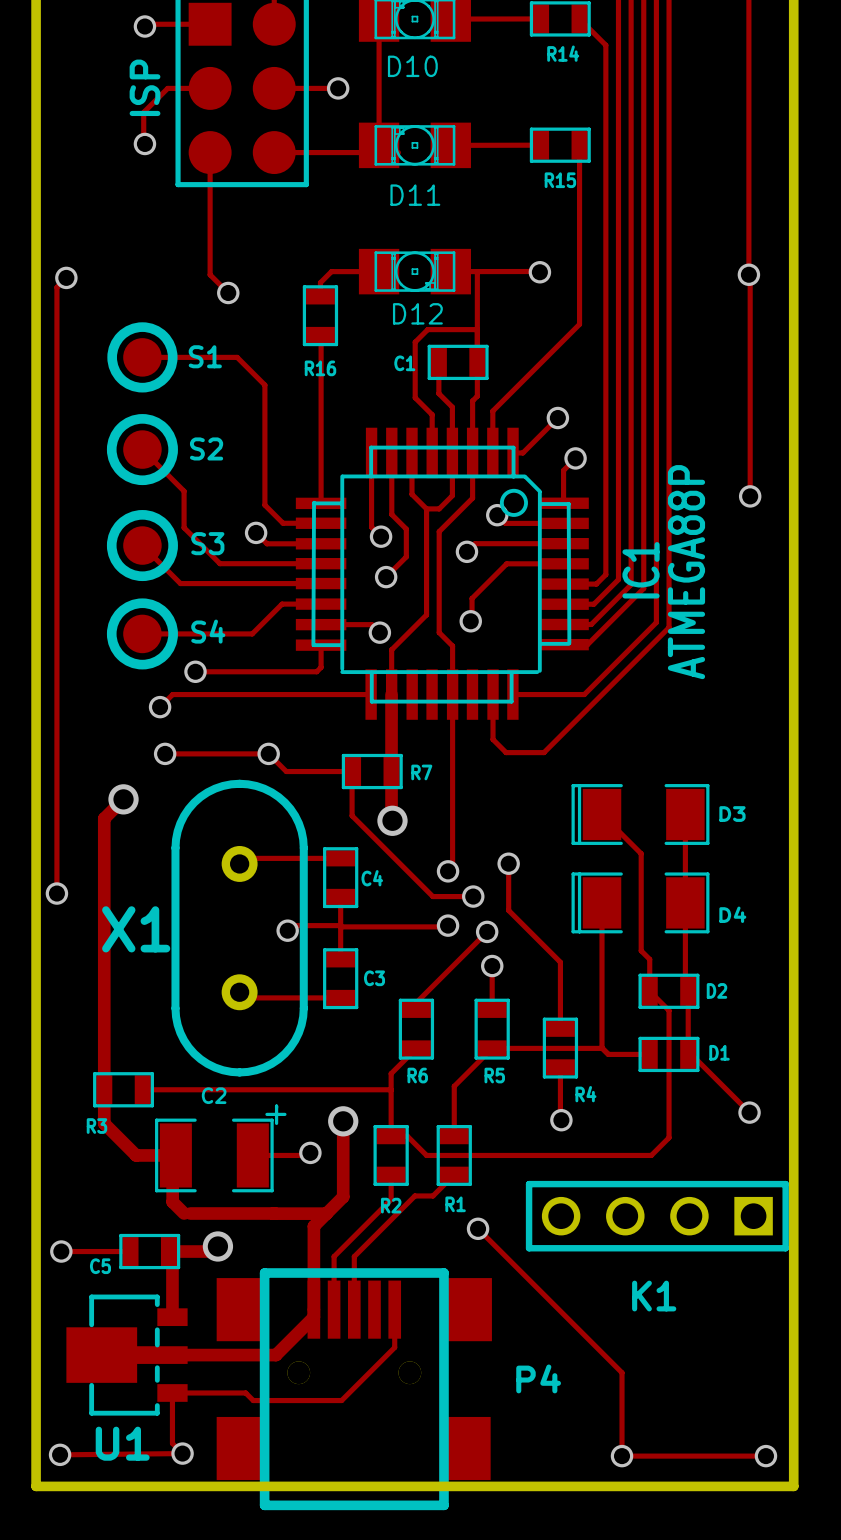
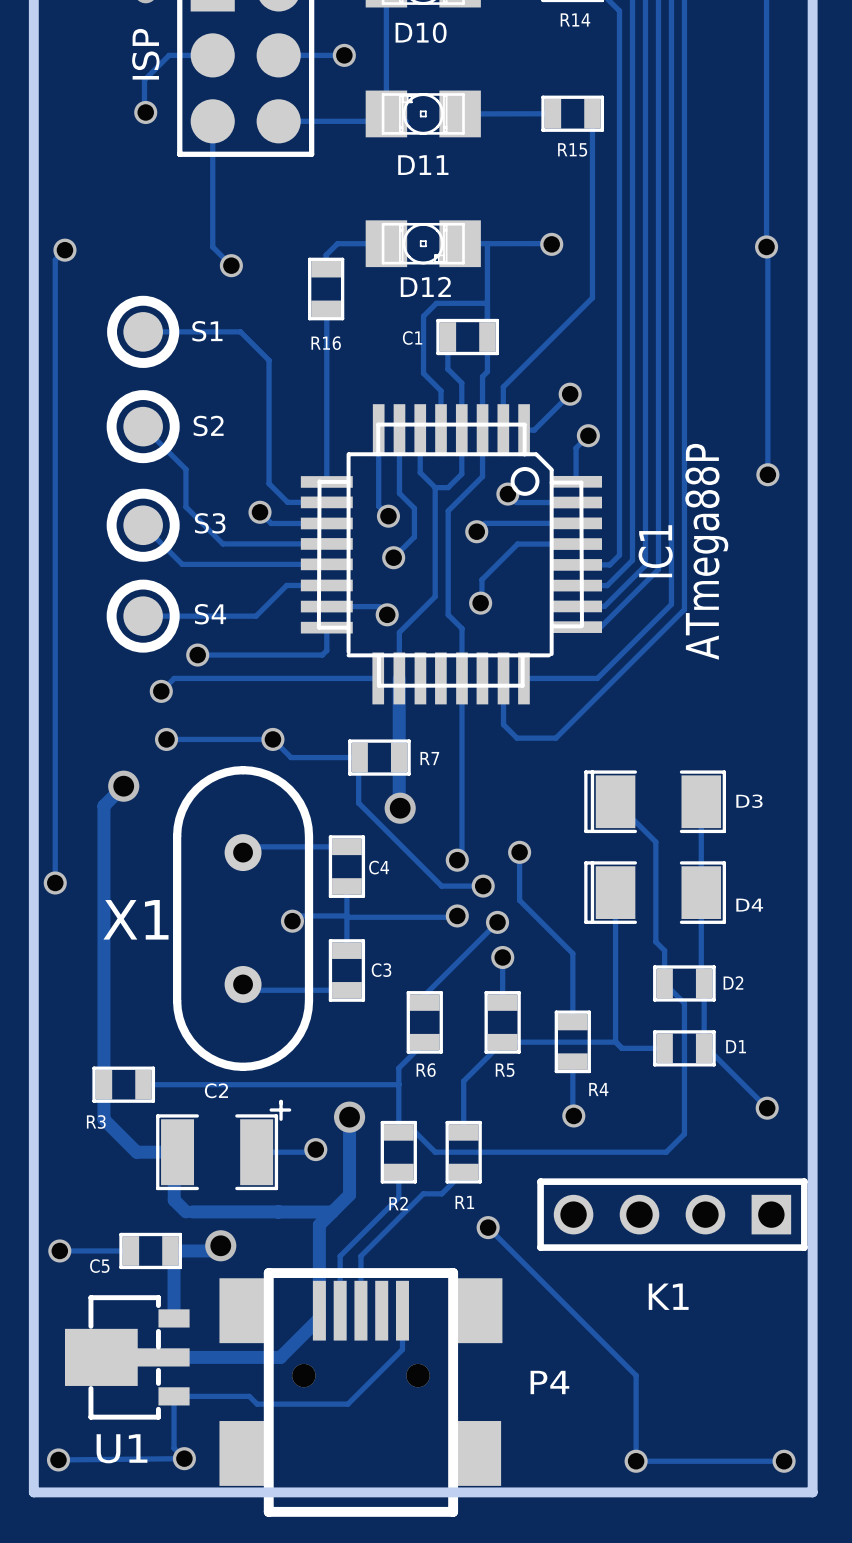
IC1 value: ATMEGA88P (686, 572) -> ATmega88P (706, 551)

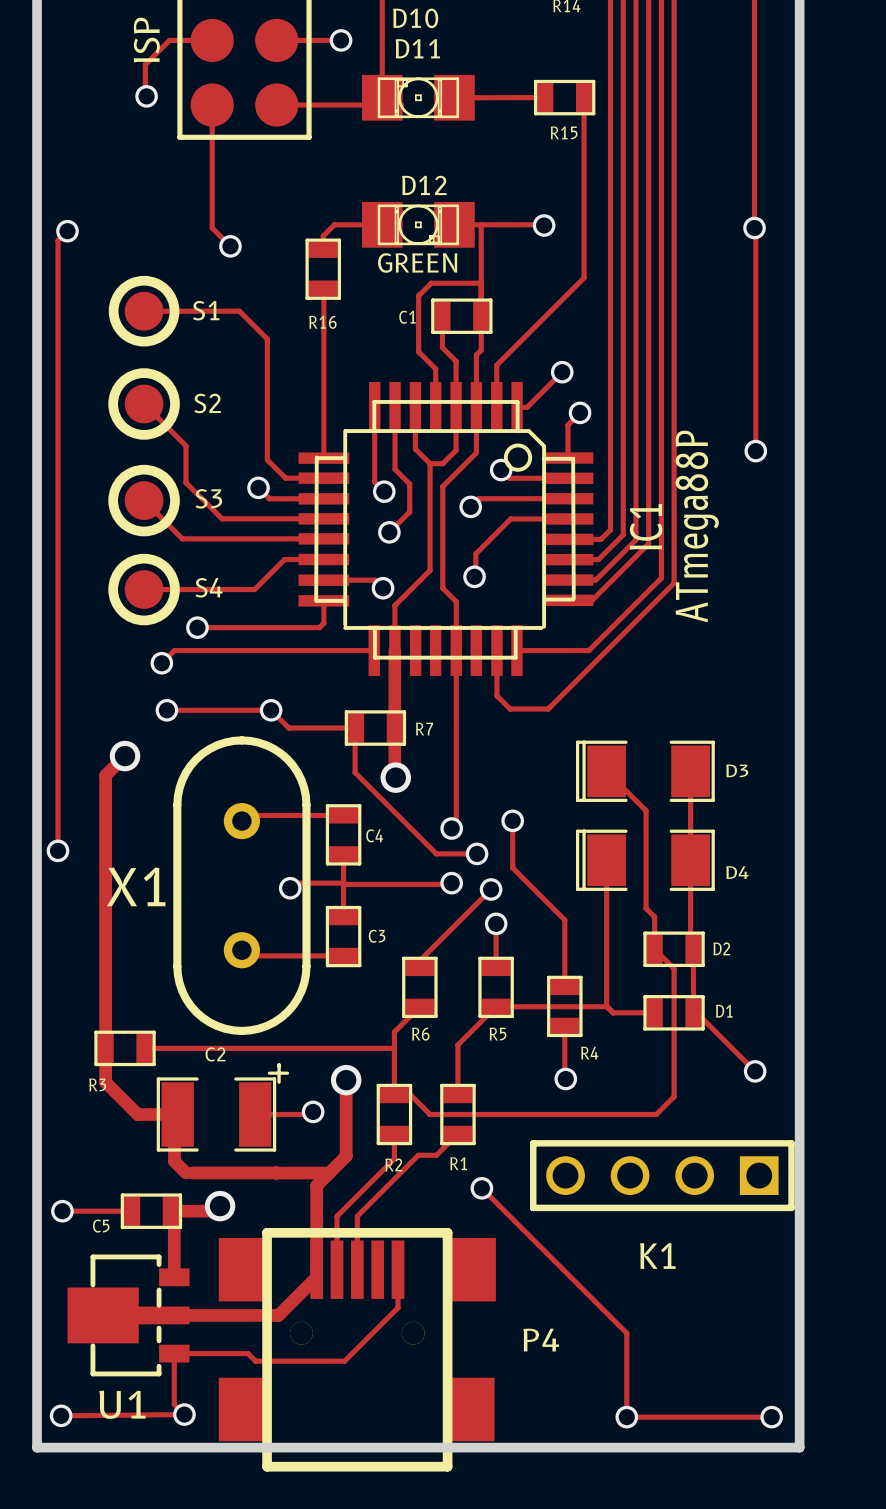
D11 name position: D11 (423, 165) -> D11 (417, 48)
D12 value: none -> GREEN (417, 262)
D12 name position: D12 (425, 286) -> D12 (424, 185)

